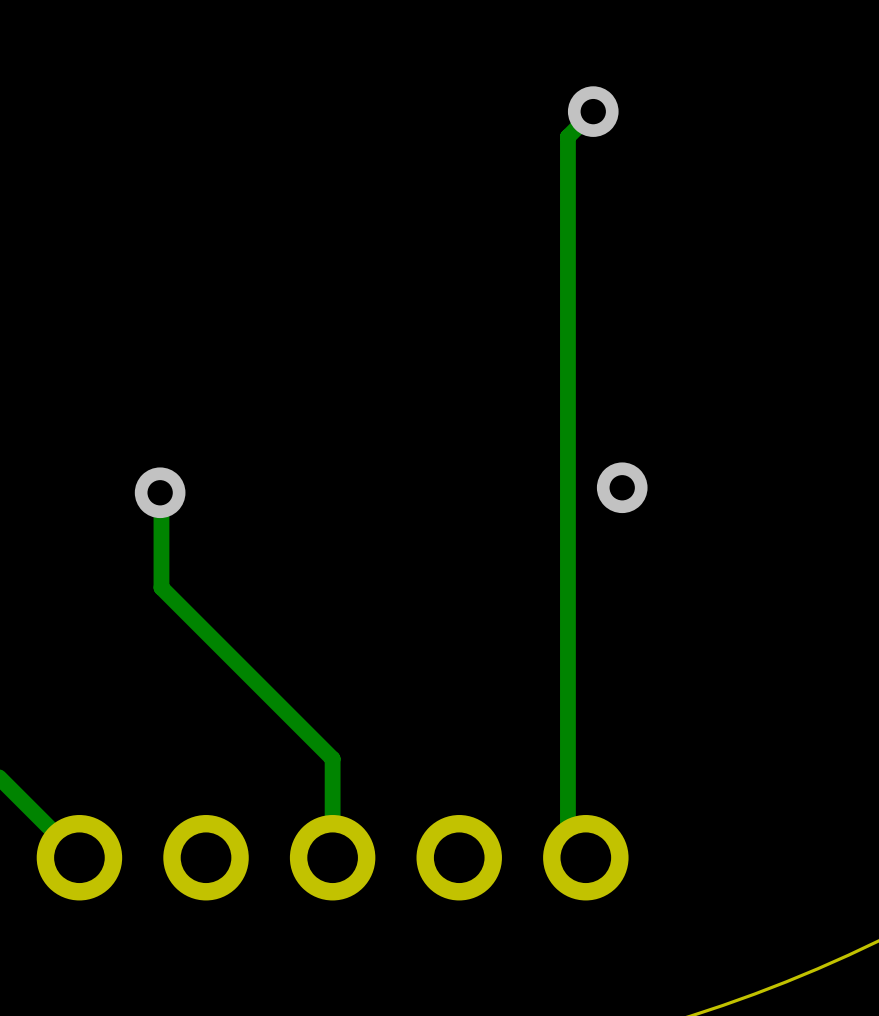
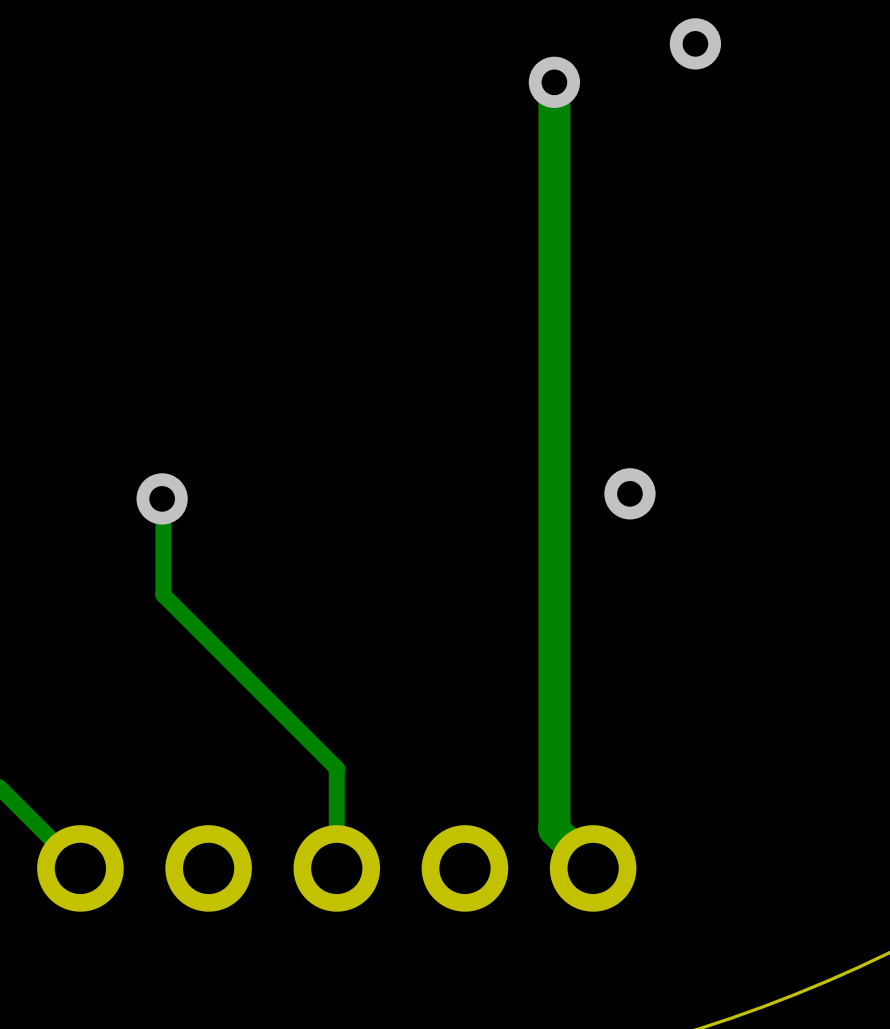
via: none -> (695, 43)
track: (593, 111) (567, 136) (567, 839) -> (554, 82) (554, 829) (575, 850)
via position: (593, 111) -> (554, 82)

